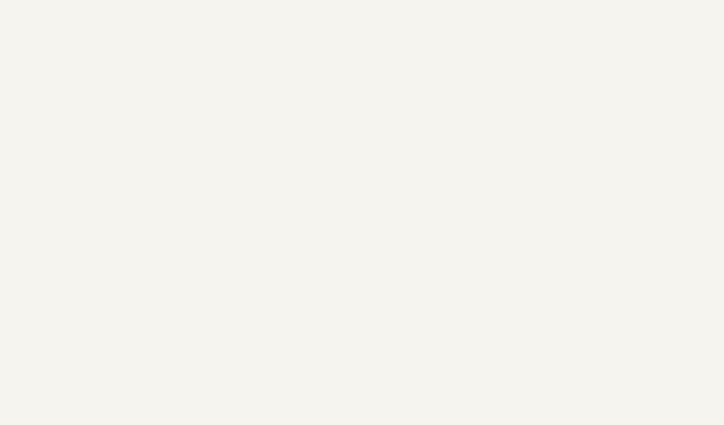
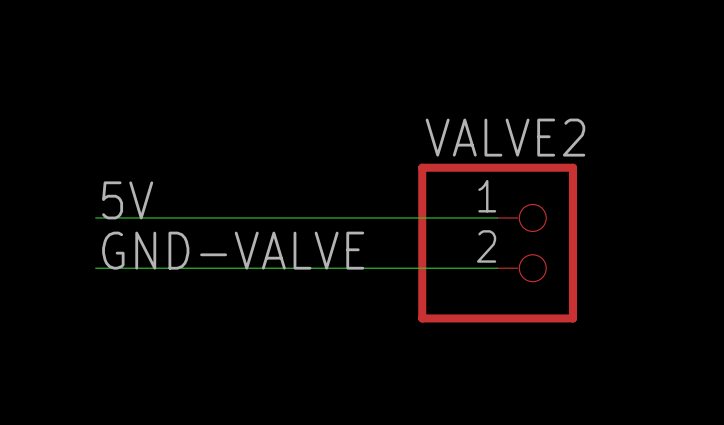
label: none -> 5V (127, 200)
wire: none -> (95, 217) (497, 217)
VALVE2: none -> (497, 243)
label: none -> GND-VALVE (233, 250)
wire: none -> (95, 268) (497, 268)

